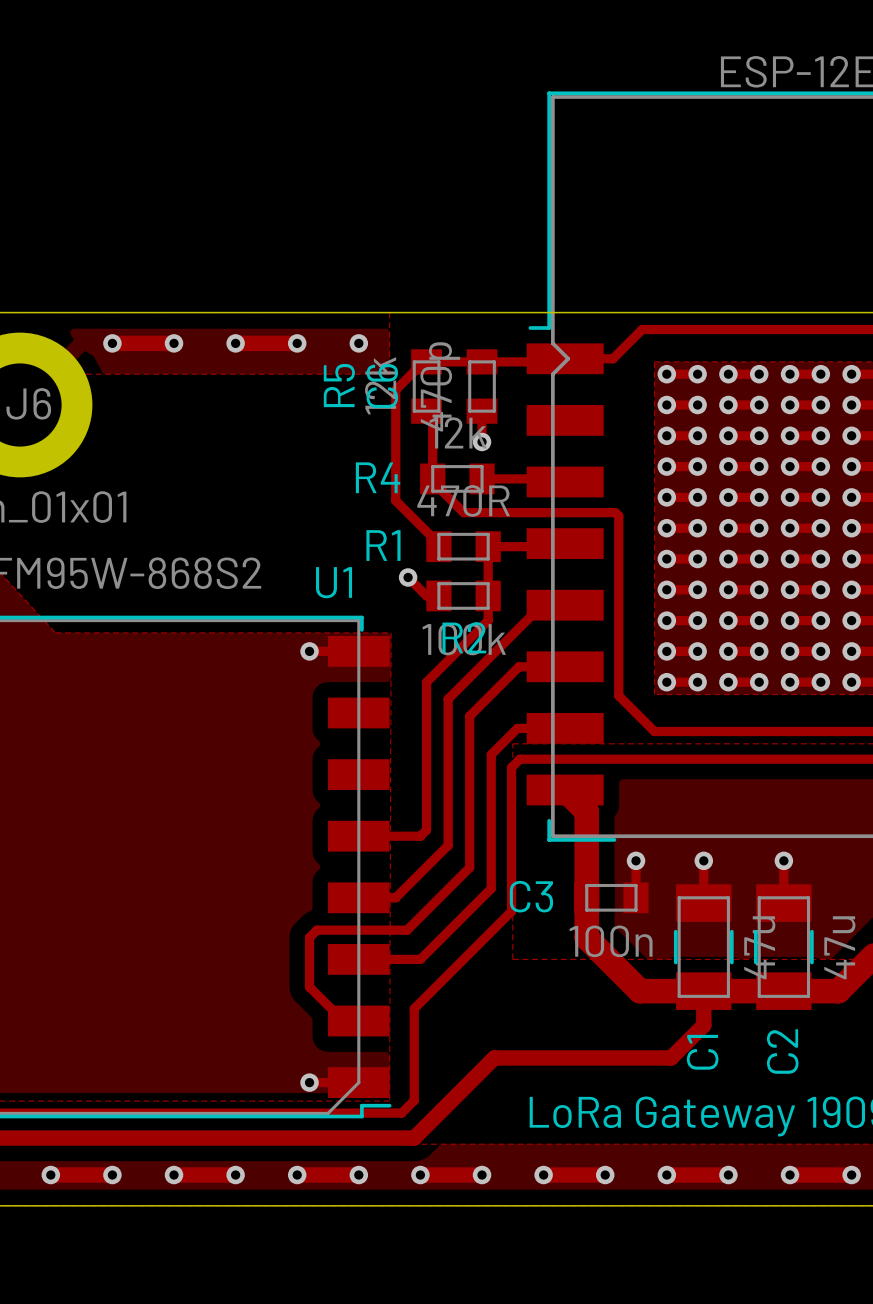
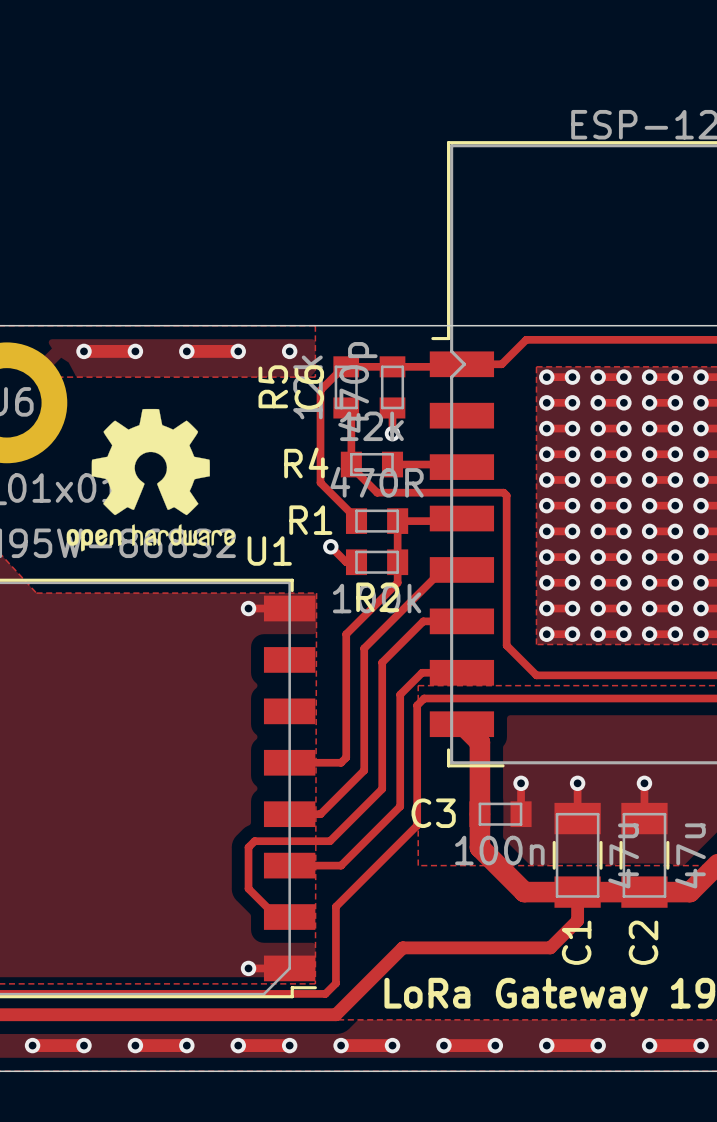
drawing: none -> [66, 408, 235, 552]

